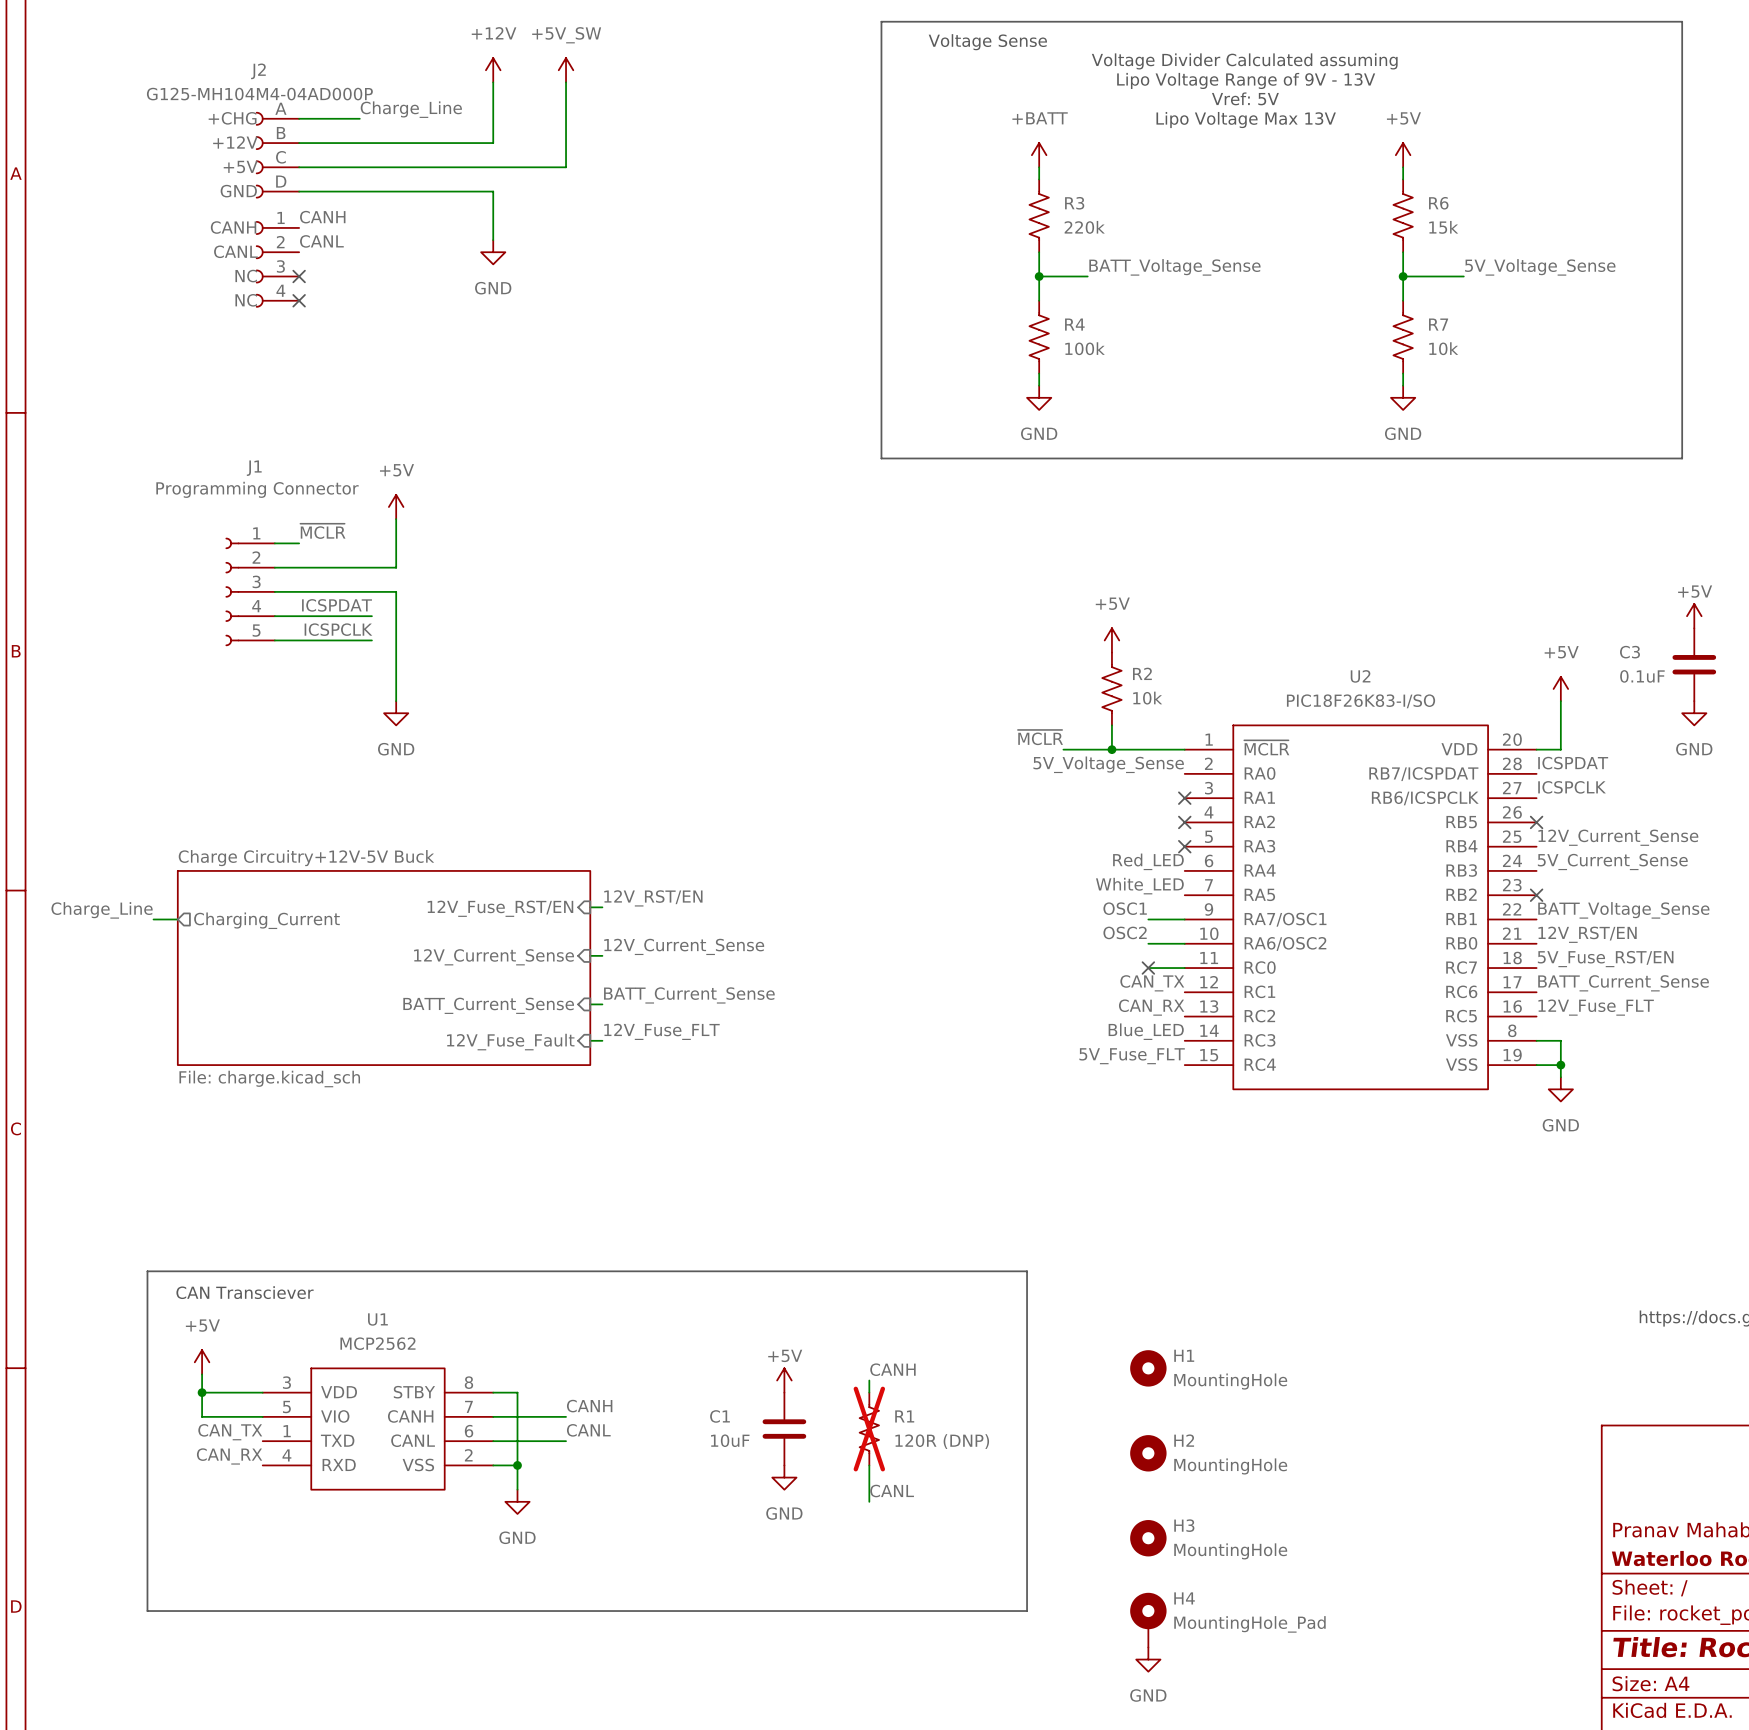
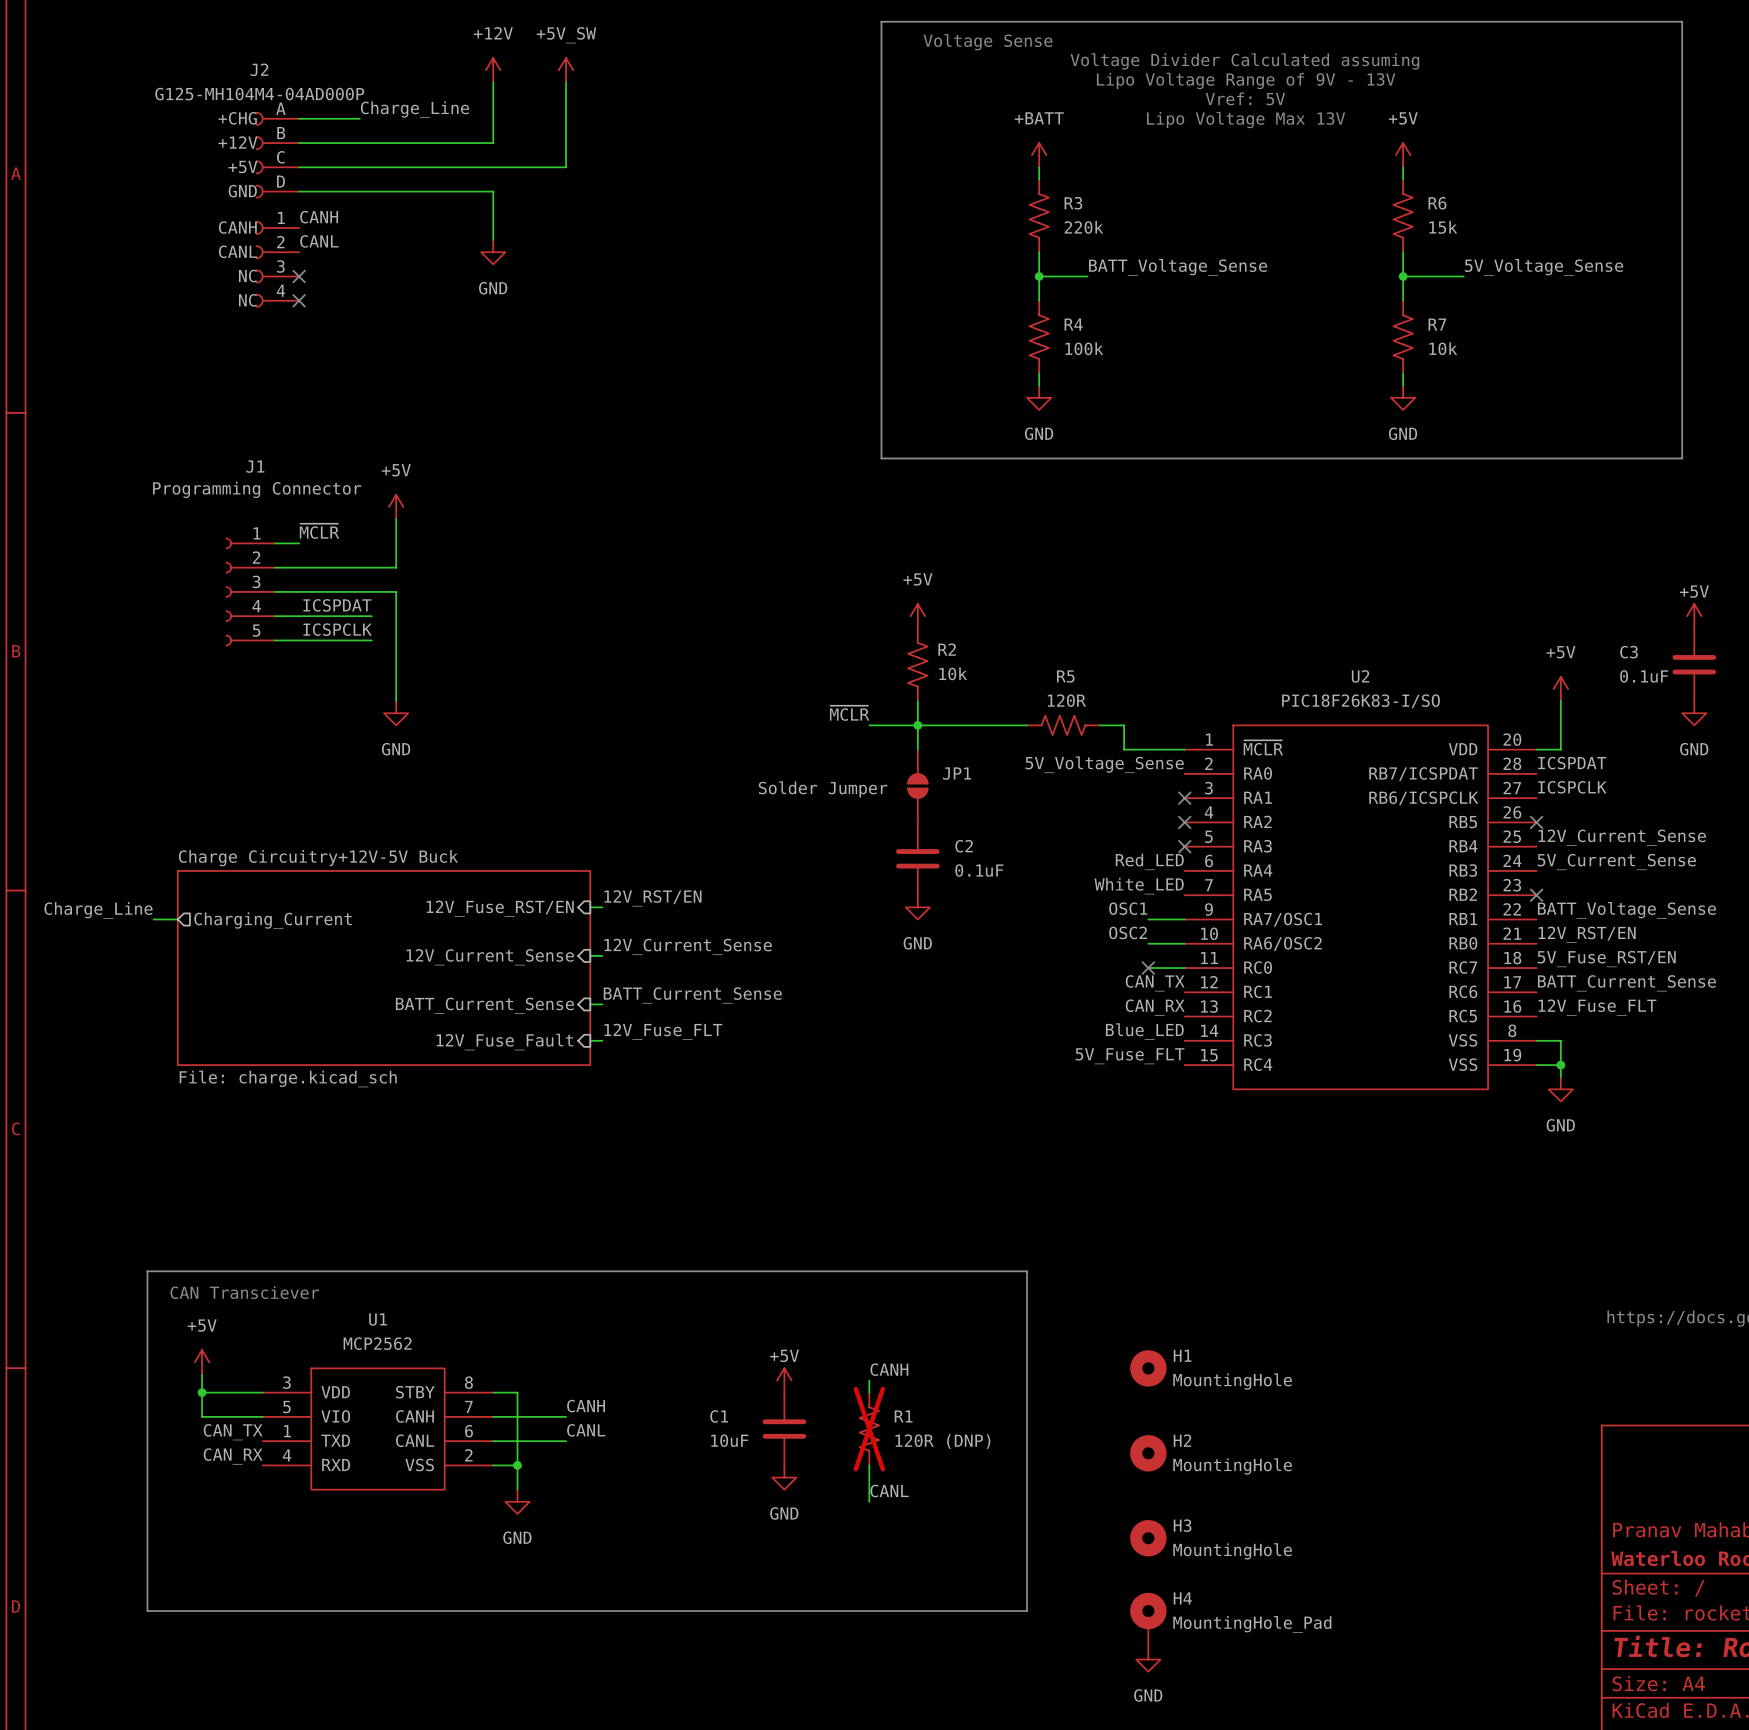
power symbol position: +5V (1111, 640) -> +5V (917, 616)
R2 position: (1111, 688) -> (917, 664)
wire: none -> (917, 701) (917, 749)
wire: none -> (869, 725) (1027, 725)
junction: none -> (917, 725)
R5: none -> 120R (1063, 725)
wire: (1111, 725) (1111, 749) -> none
label position: ~{MCLR} (1040, 737) -> ~{MCLR} (849, 713)
wire: (1063, 749) (1124, 749) -> (1099, 725) (1124, 725) (1124, 749)
junction: (1111, 749) -> none
JP1: none -> Solder Jumper (917, 786)
C2: none -> 0.1uF (917, 858)
power symbol: none -> GND (917, 907)

